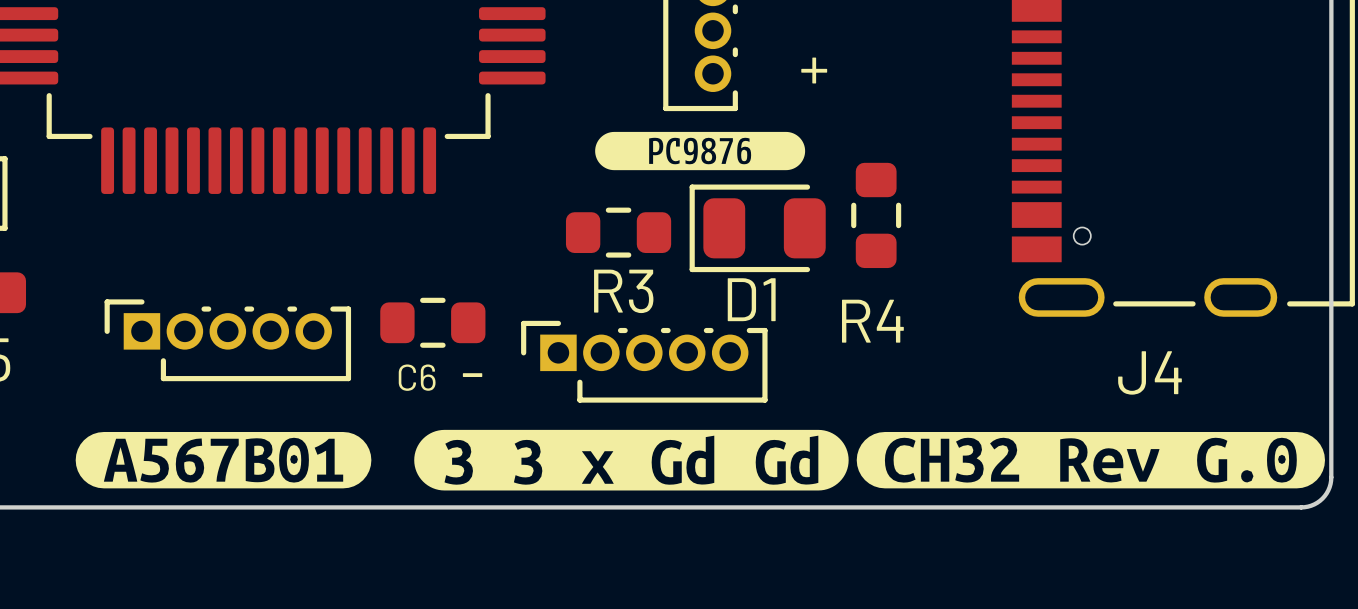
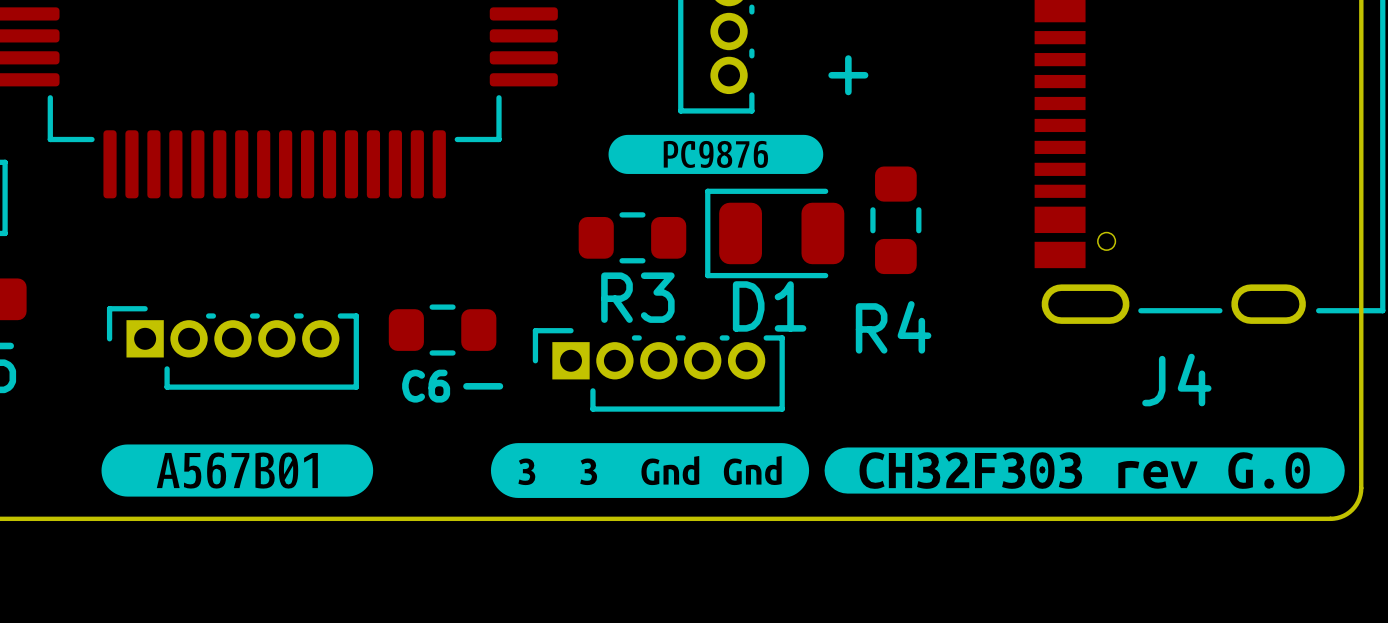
drawing shape: [414, 429, 849, 491] -> [490, 443, 810, 498]
drawing shape: [75, 431, 372, 489] -> [101, 444, 374, 497]
drawing shape: [856, 431, 1326, 489] -> [824, 447, 1345, 494]

